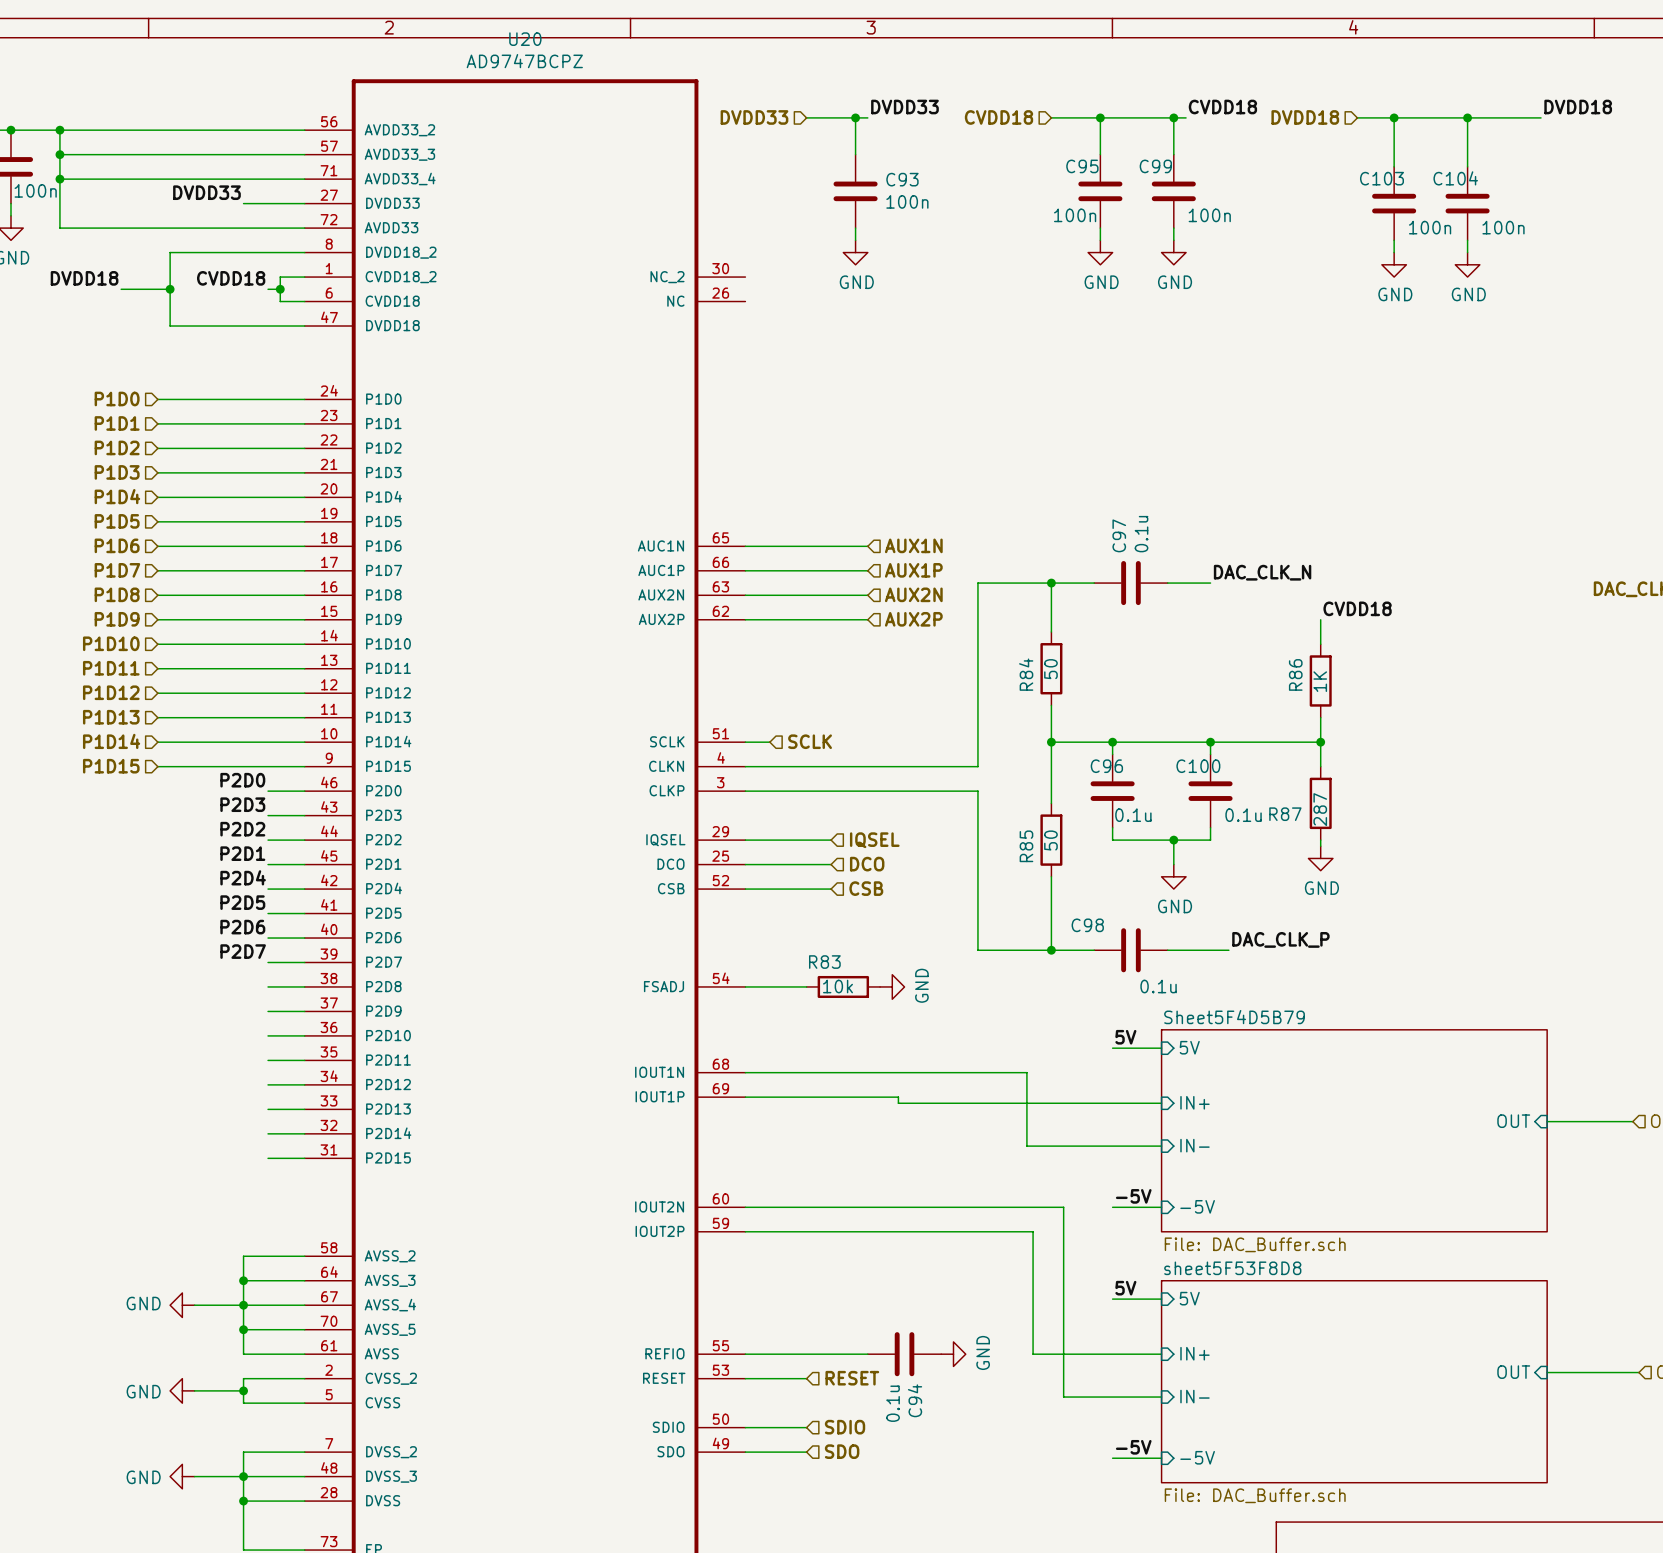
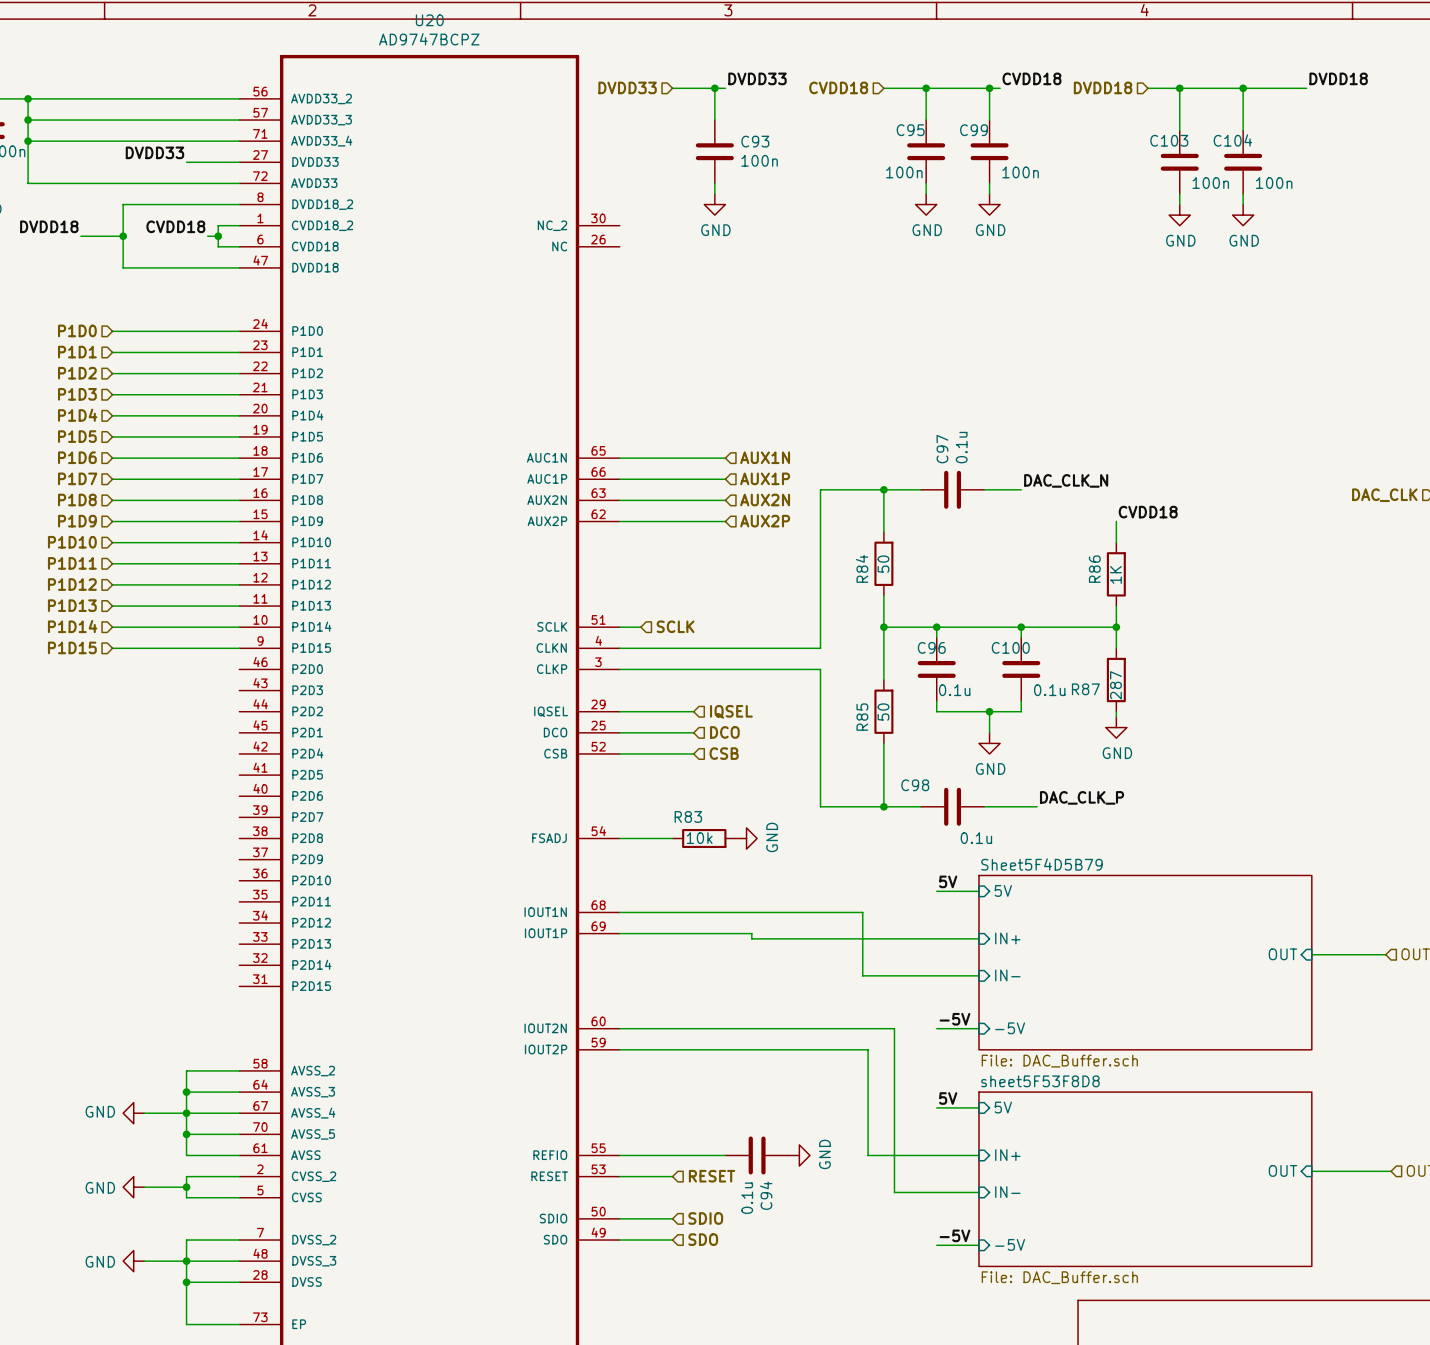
label: P2D0 (242, 780) -> none
wire: (268, 791) (304, 791) -> none
label: P2D3 (242, 804) -> none
wire: (268, 815) (304, 815) -> none
label: P2D2 (242, 829) -> none
wire: (268, 840) (304, 840) -> none
label: P2D1 (242, 853) -> none
wire: (268, 864) (304, 864) -> none
label: P2D4 (243, 877) -> none
wire: (268, 889) (304, 889) -> none
label: P2D5 (242, 902) -> none
wire: (268, 913) (304, 913) -> none
label: P2D6 (242, 927) -> none
wire: (268, 938) (304, 938) -> none
label: P2D7 (243, 951) -> none
wire: (268, 962) (304, 962) -> none
wire: (268, 986) (304, 986) -> none
wire: (268, 1011) (304, 1011) -> none
wire: (268, 1035) (304, 1035) -> none
wire: (268, 1060) (304, 1060) -> none
wire: (268, 1084) (304, 1084) -> none
wire: (268, 1109) (304, 1109) -> none
wire: (268, 1133) (304, 1133) -> none
wire: (268, 1158) (304, 1158) -> none

